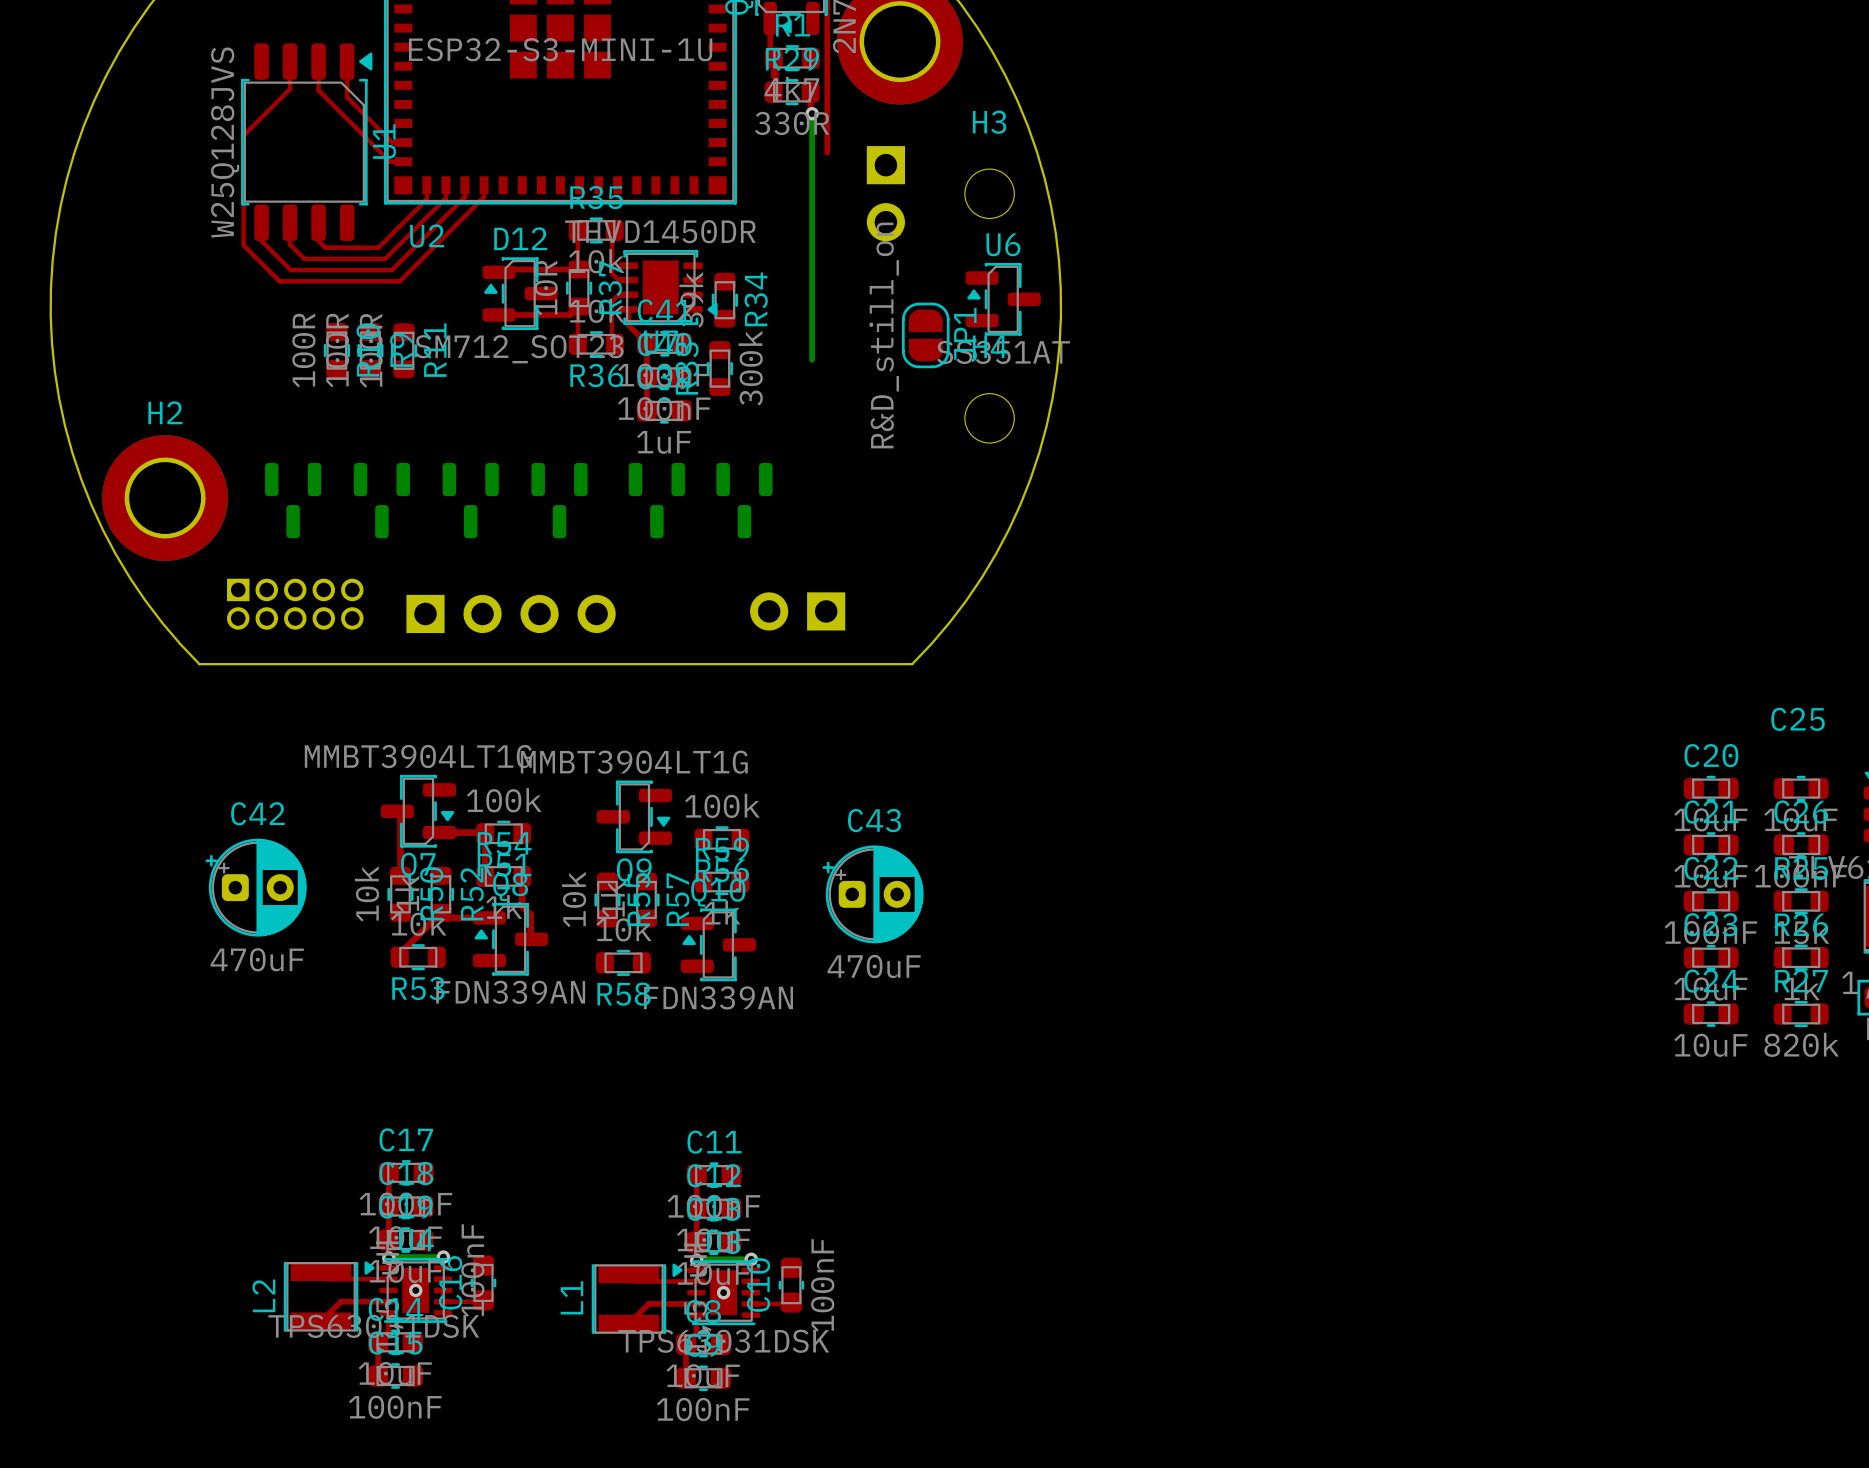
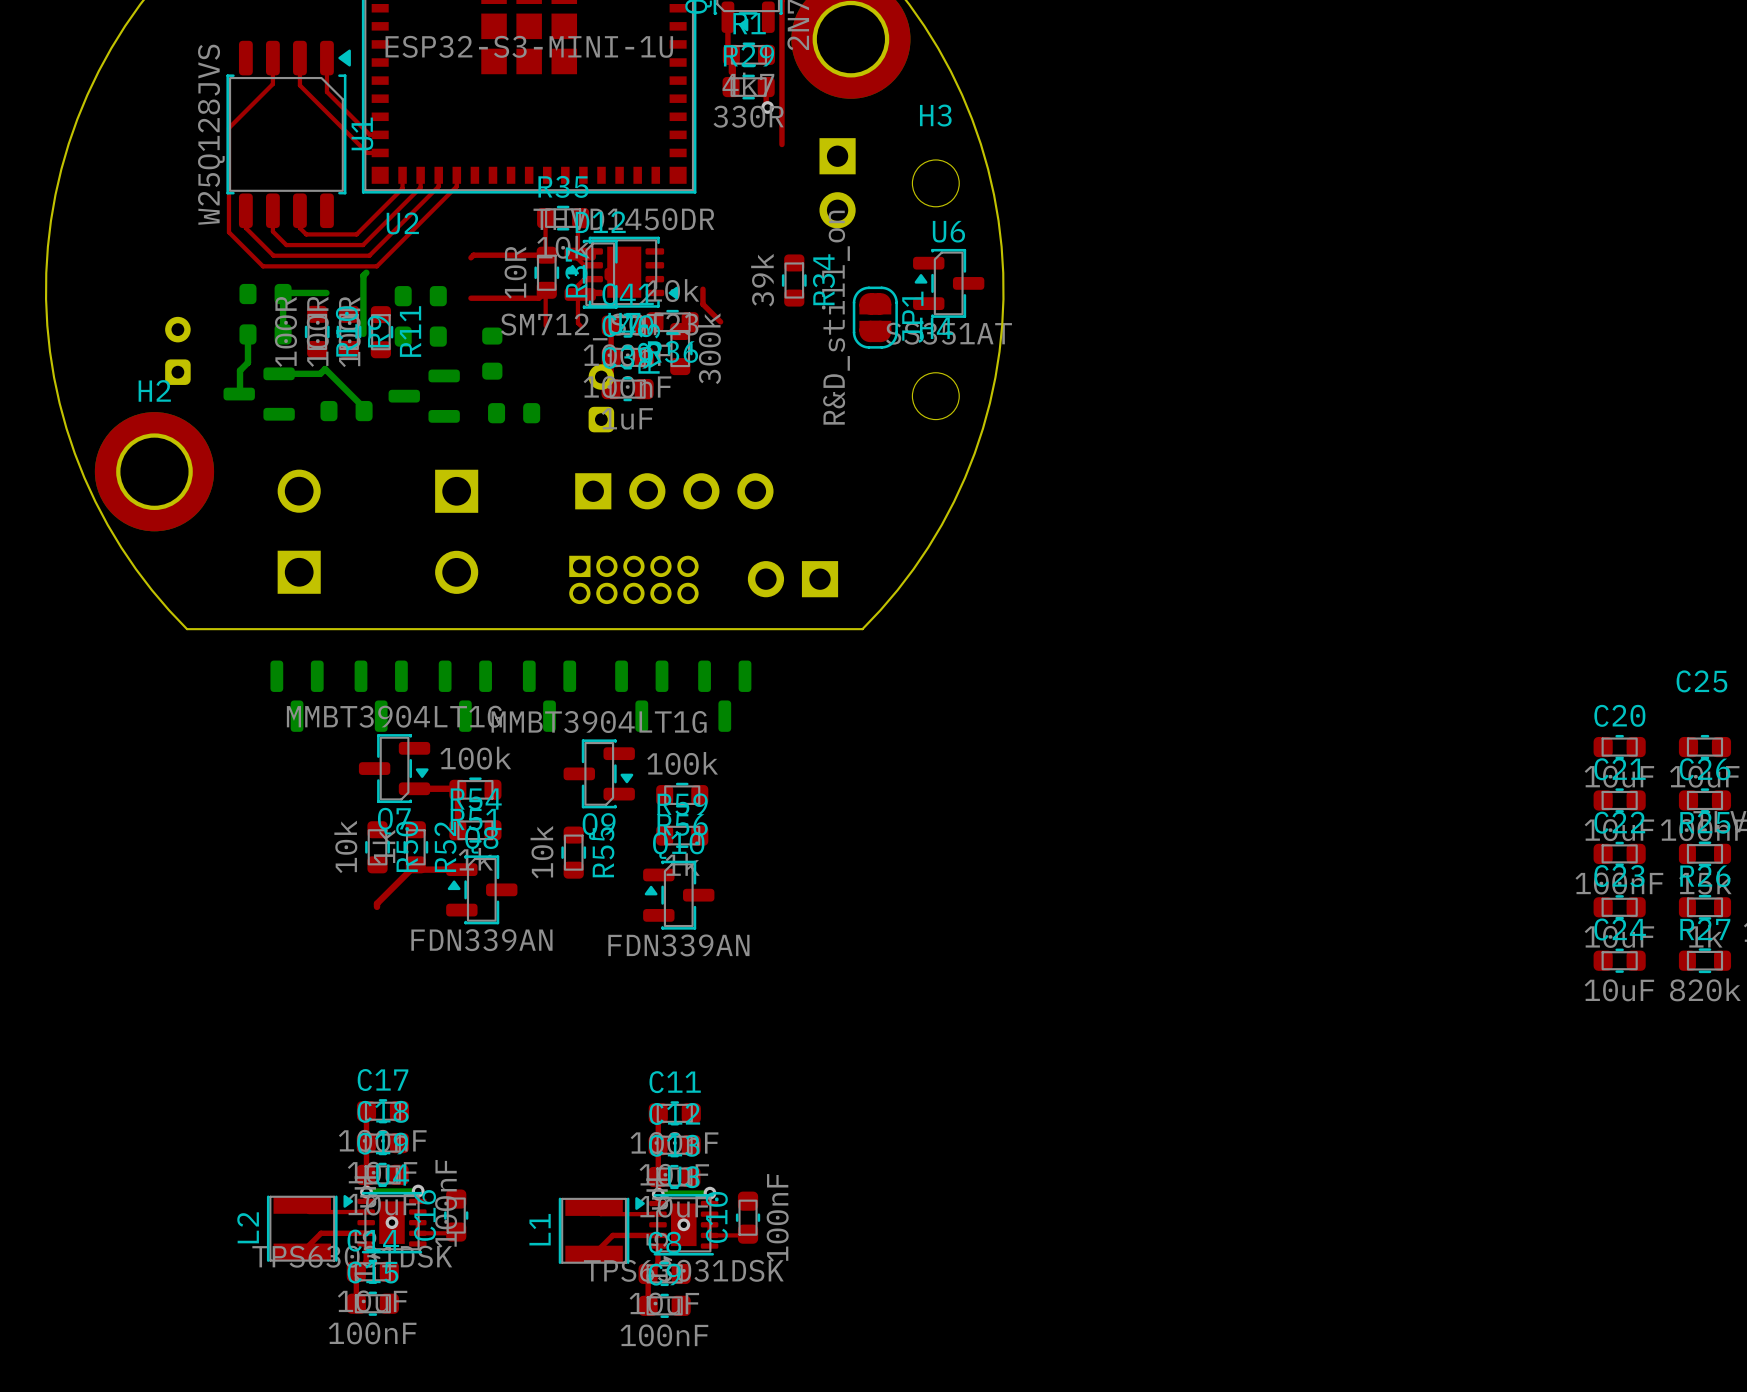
bottom track: (812, 113) (812, 359) -> none
bottom track: none -> (366, 272) (363, 275) (363, 333)
D12 position: (520, 293) -> (600, 274)
R34 position: (724, 300) -> (794, 280)
bottom track: none -> (326, 292) (284, 292) (283, 334)
top track: (628, 309) (628, 325) (647, 343) -> (702, 289) (702, 304) (720, 321)
part: none -> (265, 294)
part: none -> (420, 296)
R36 position: (596, 344) -> (672, 322)
bottom track: none -> (248, 334) (247, 362) (240, 370) (239, 394)
part: none -> (265, 334)
part: none -> (420, 336)
bottom track: none -> (279, 373) (320, 373) (325, 369) (363, 407) (363, 411)
part: none -> (259, 394)
part: none -> (424, 396)
part: (293, 500) -> none
part: (381, 500) -> none
part: (470, 500) -> none
part: (559, 500) -> none
part: (656, 500) -> none
part: (744, 500) -> none
part: none -> (299, 531)
part: none -> (456, 531)
part position: (295, 604) -> (633, 579)
part position: (797, 611) -> (792, 579)
part position: (511, 613) -> (674, 491)
part: none -> (297, 696)
part: none -> (381, 696)
part: none -> (465, 696)
part: none -> (549, 696)
part: none -> (641, 696)
part: none -> (724, 696)
top track: (397, 811) (400, 814) (400, 875) -> none
top track: (521, 876) (522, 906) (530, 914) (531, 939) -> none
C42 side: top (256, 887) -> bottom (177, 350)
C43 side: top (873, 894) -> bottom (601, 398)
R57 side: top (646, 899) -> bottom (492, 353)
R53 side: top (418, 957) -> bottom (346, 411)
R58 side: top (623, 962) -> bottom (514, 413)

